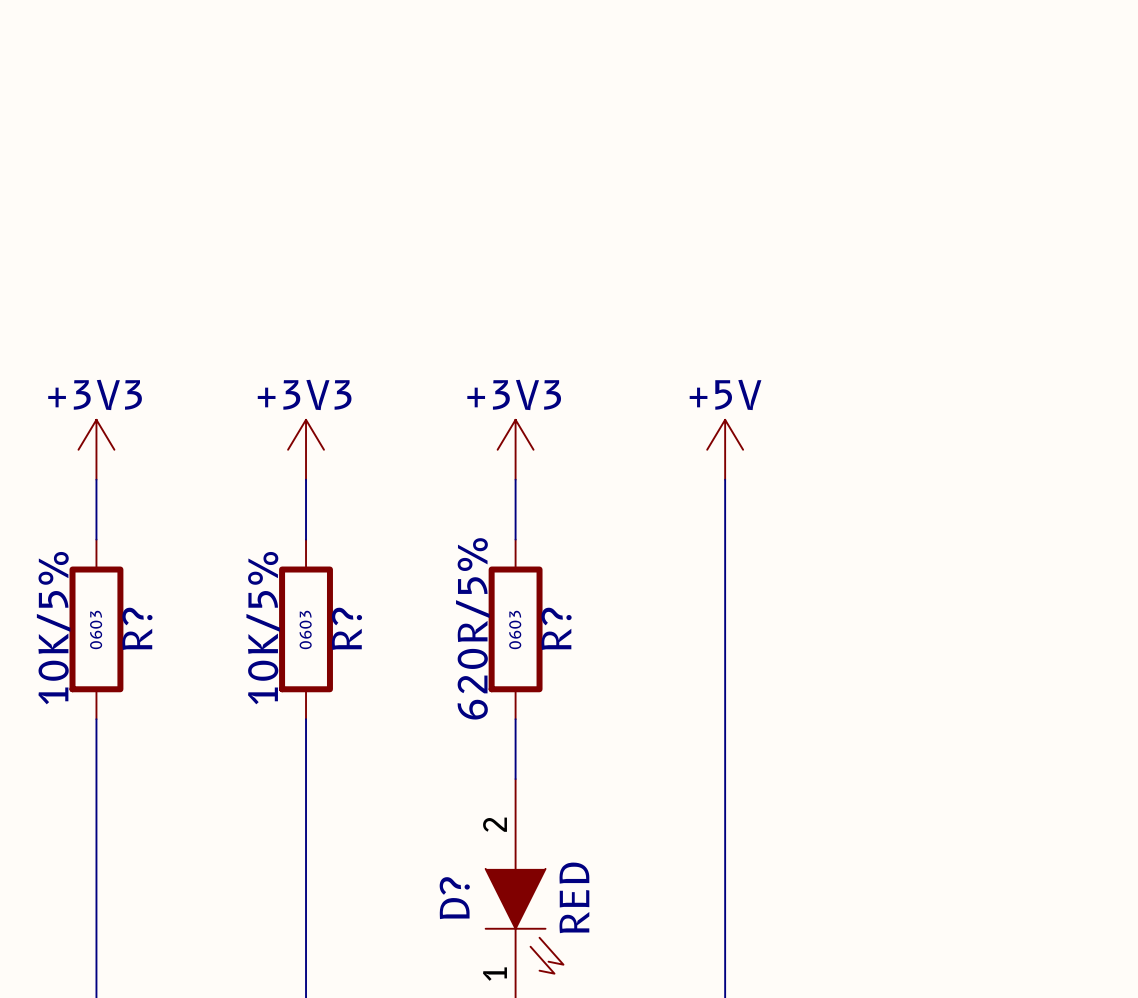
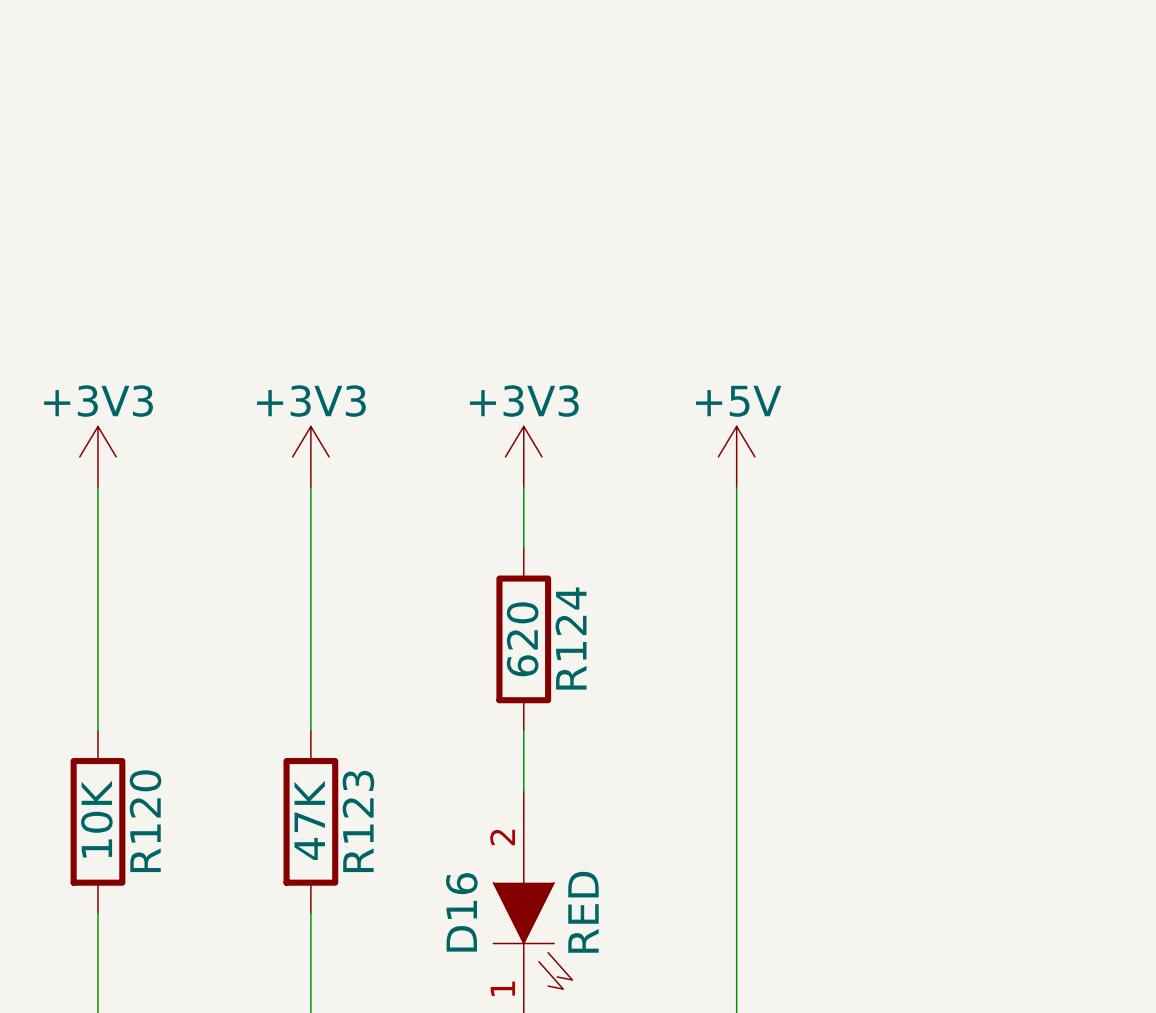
R? value: 620R/5% (472, 628) -> 620 (522, 639)
R? name: R? (556, 628) -> R124 (571, 638)
R?: 10K/5% (96, 629) -> none
R?: 10K/5% (306, 629) -> none
R? text: 0603 (515, 629) -> none
wire: (96, 719) (96, 898) -> (97, 730) (97, 548)
wire: (306, 719) (306, 898) -> (310, 730) (310, 548)
R120: none -> 10K (97, 821)
R123: none -> 47K (310, 821)
D? name: D? (454, 898) -> D16 (461, 912)

